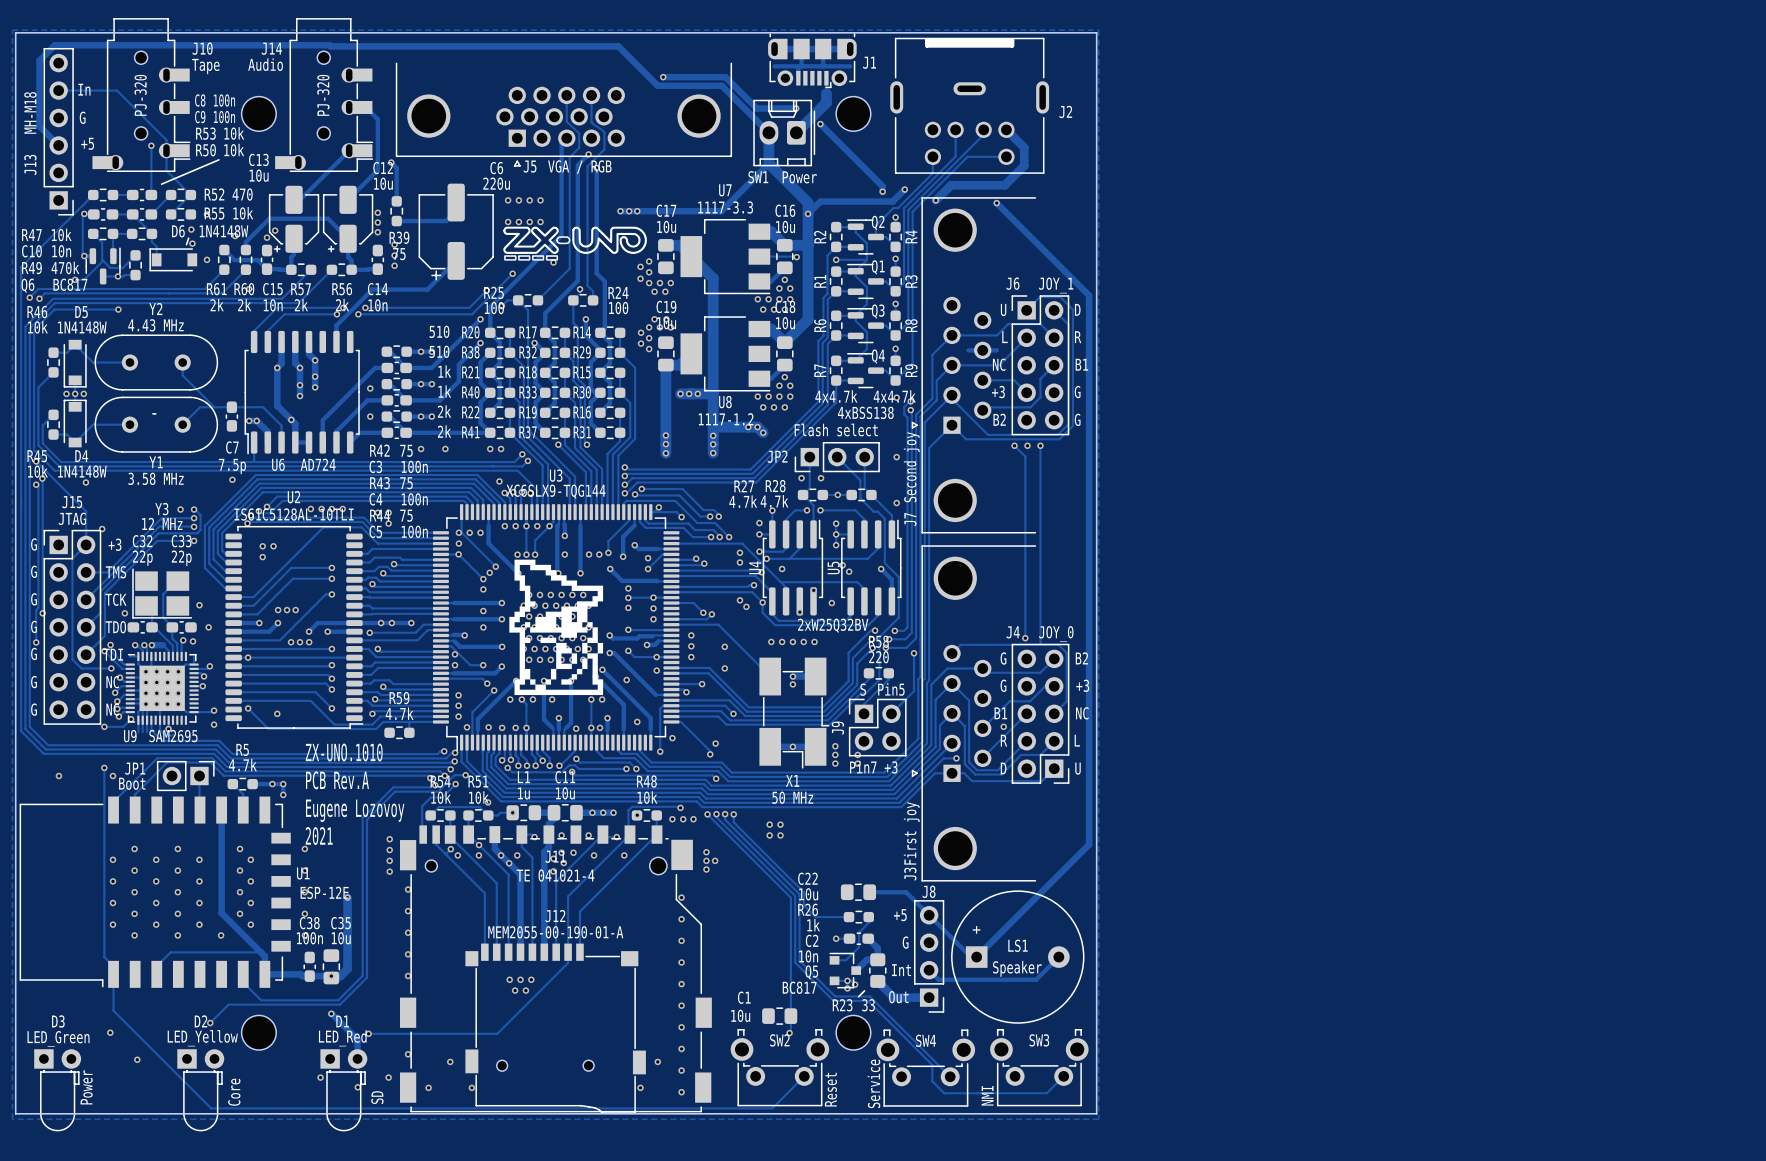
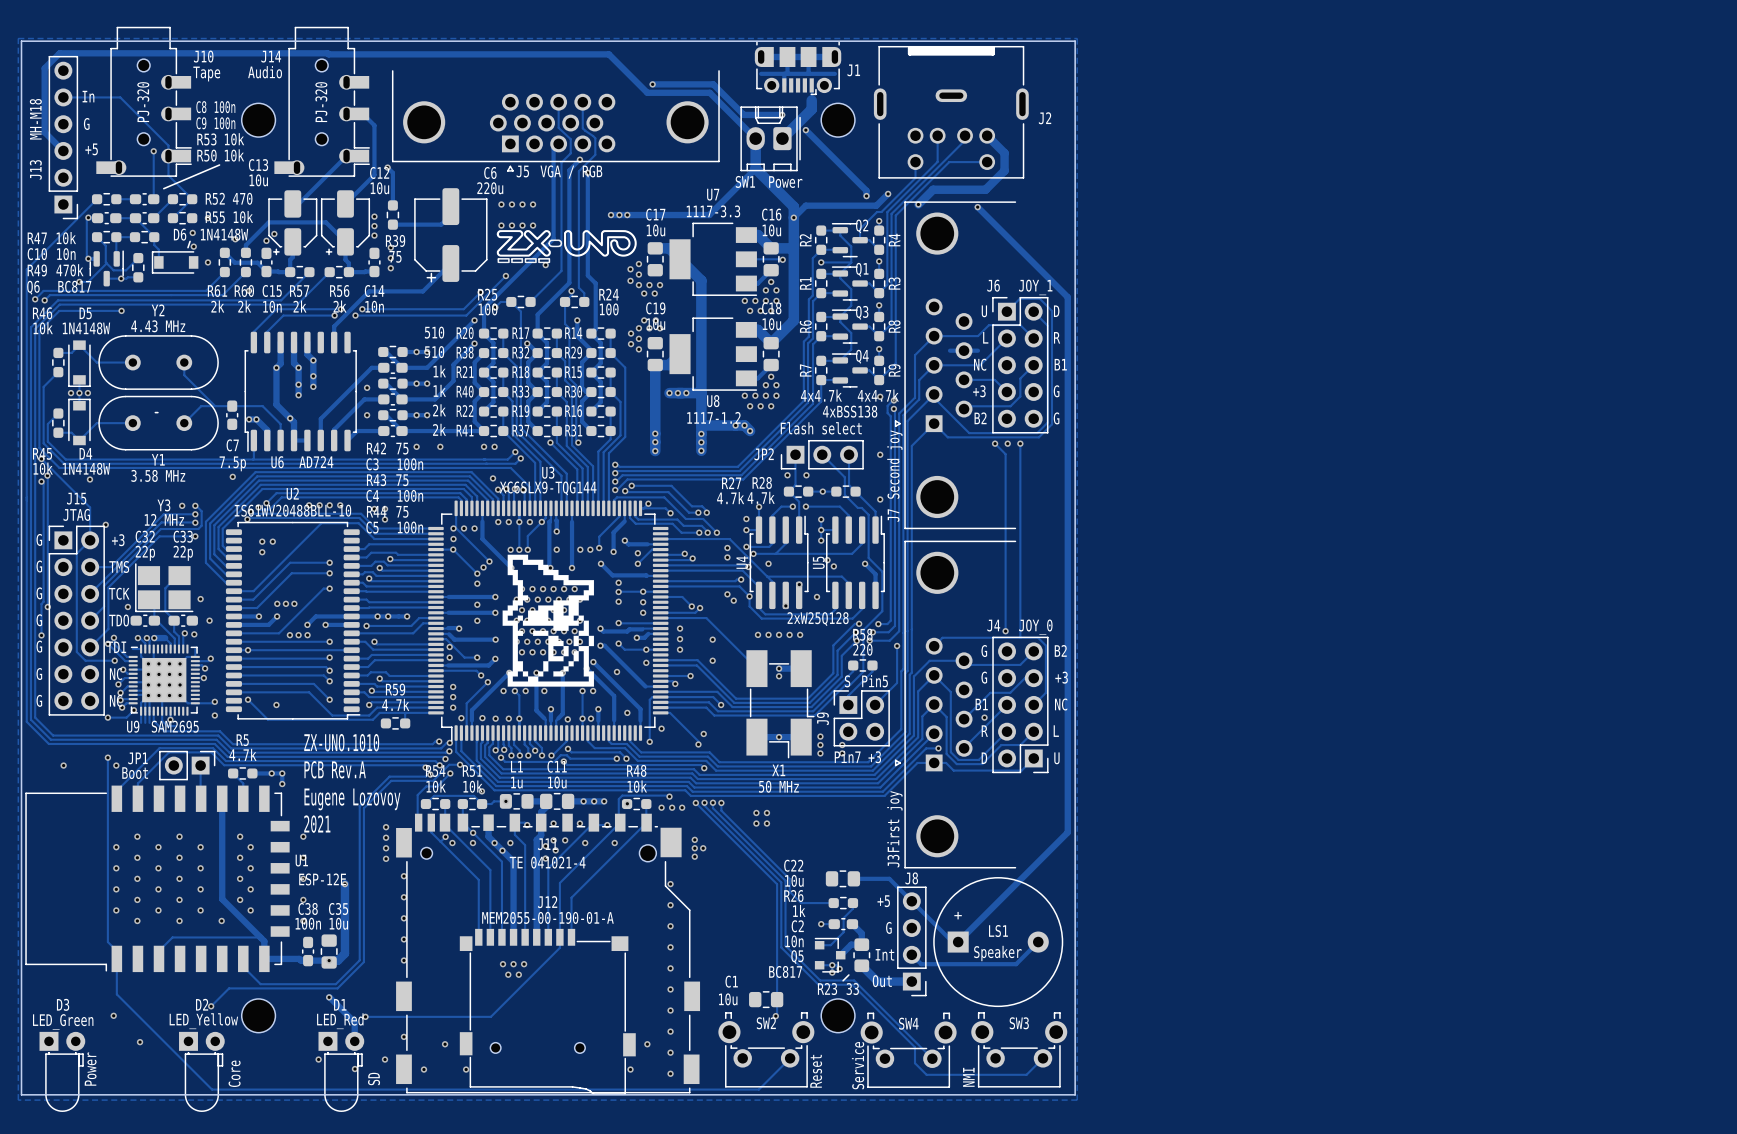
U2 value: IS61C5128AL-10TLI (294, 514) -> IS61WV20488BLL-10 (293, 510)
U4 text: 2xW25Q32BV (833, 625) -> 2xW25Q128 (818, 619)

